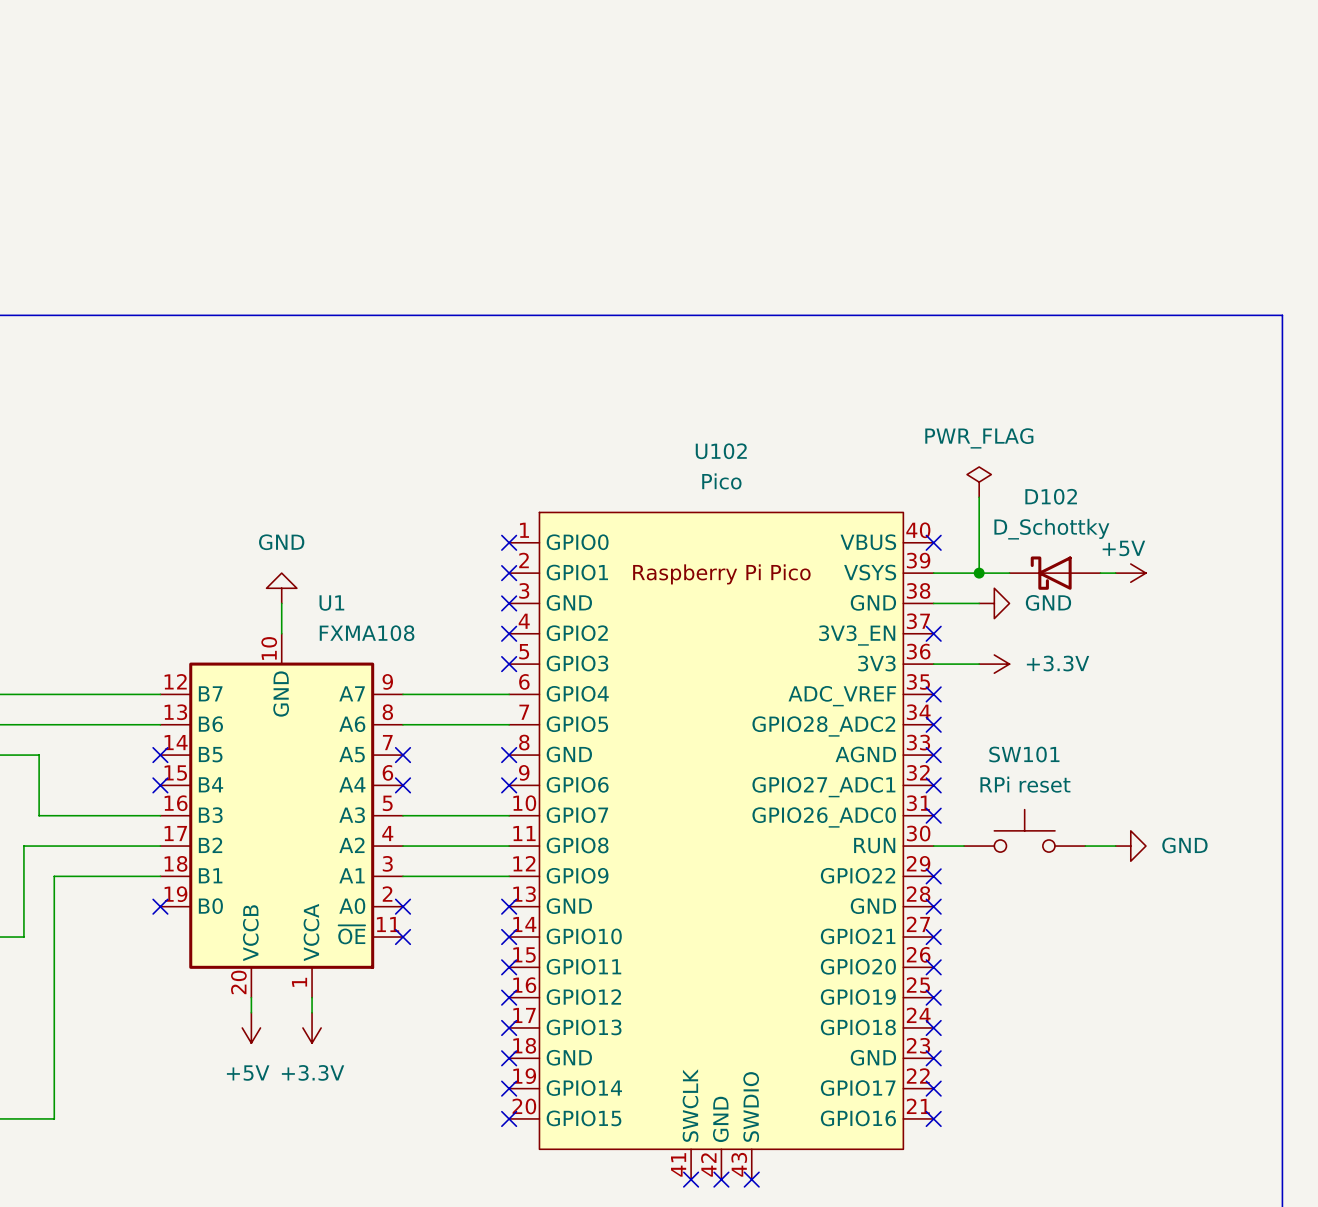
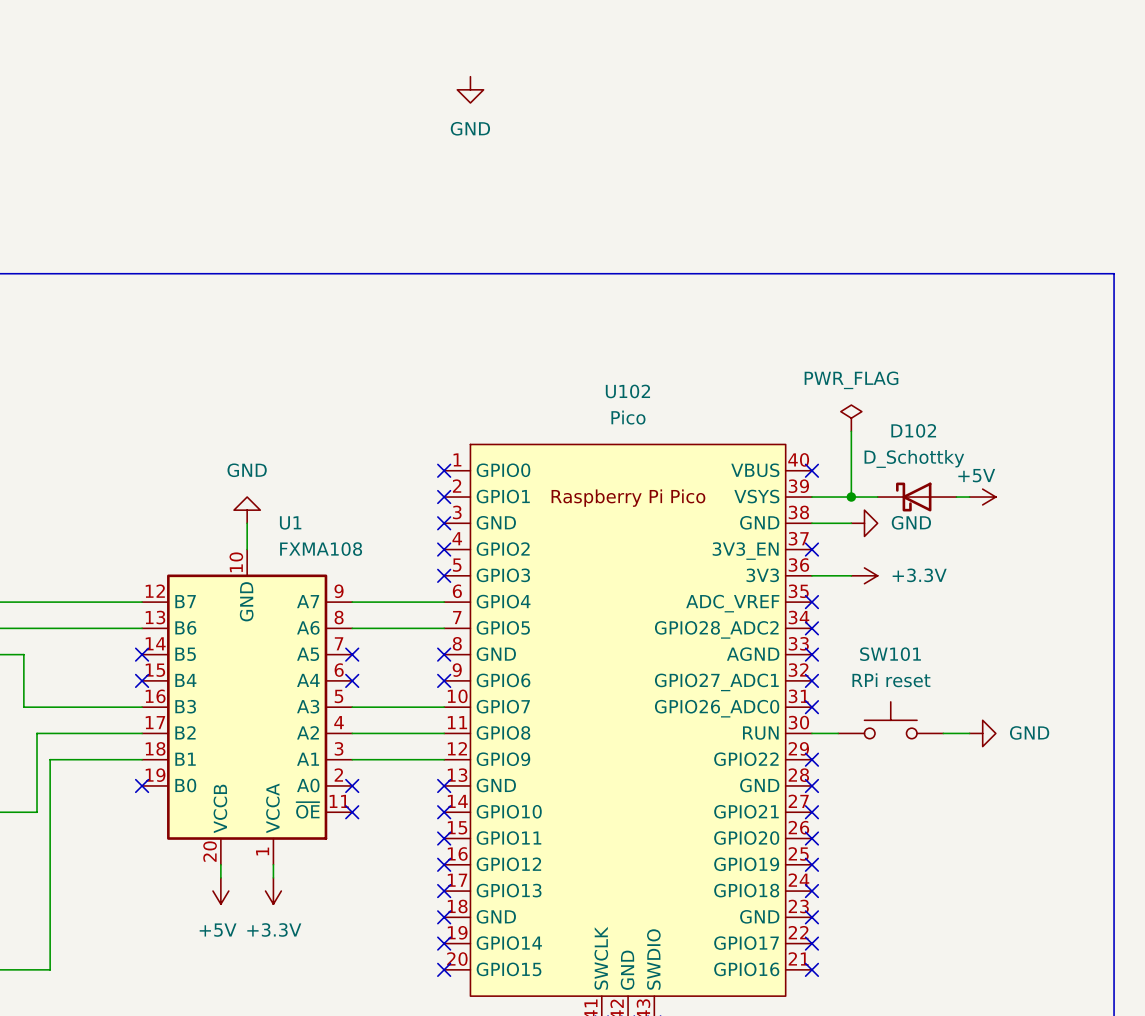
power symbol: none -> GND (470, 89)
wire: (23, 755) (39, 755) (39, 815) -> (23, 654) (23, 707) (37, 707)
wire: (39, 846) (23, 846) (23, 937) -> (37, 733) (37, 812) (23, 812)

